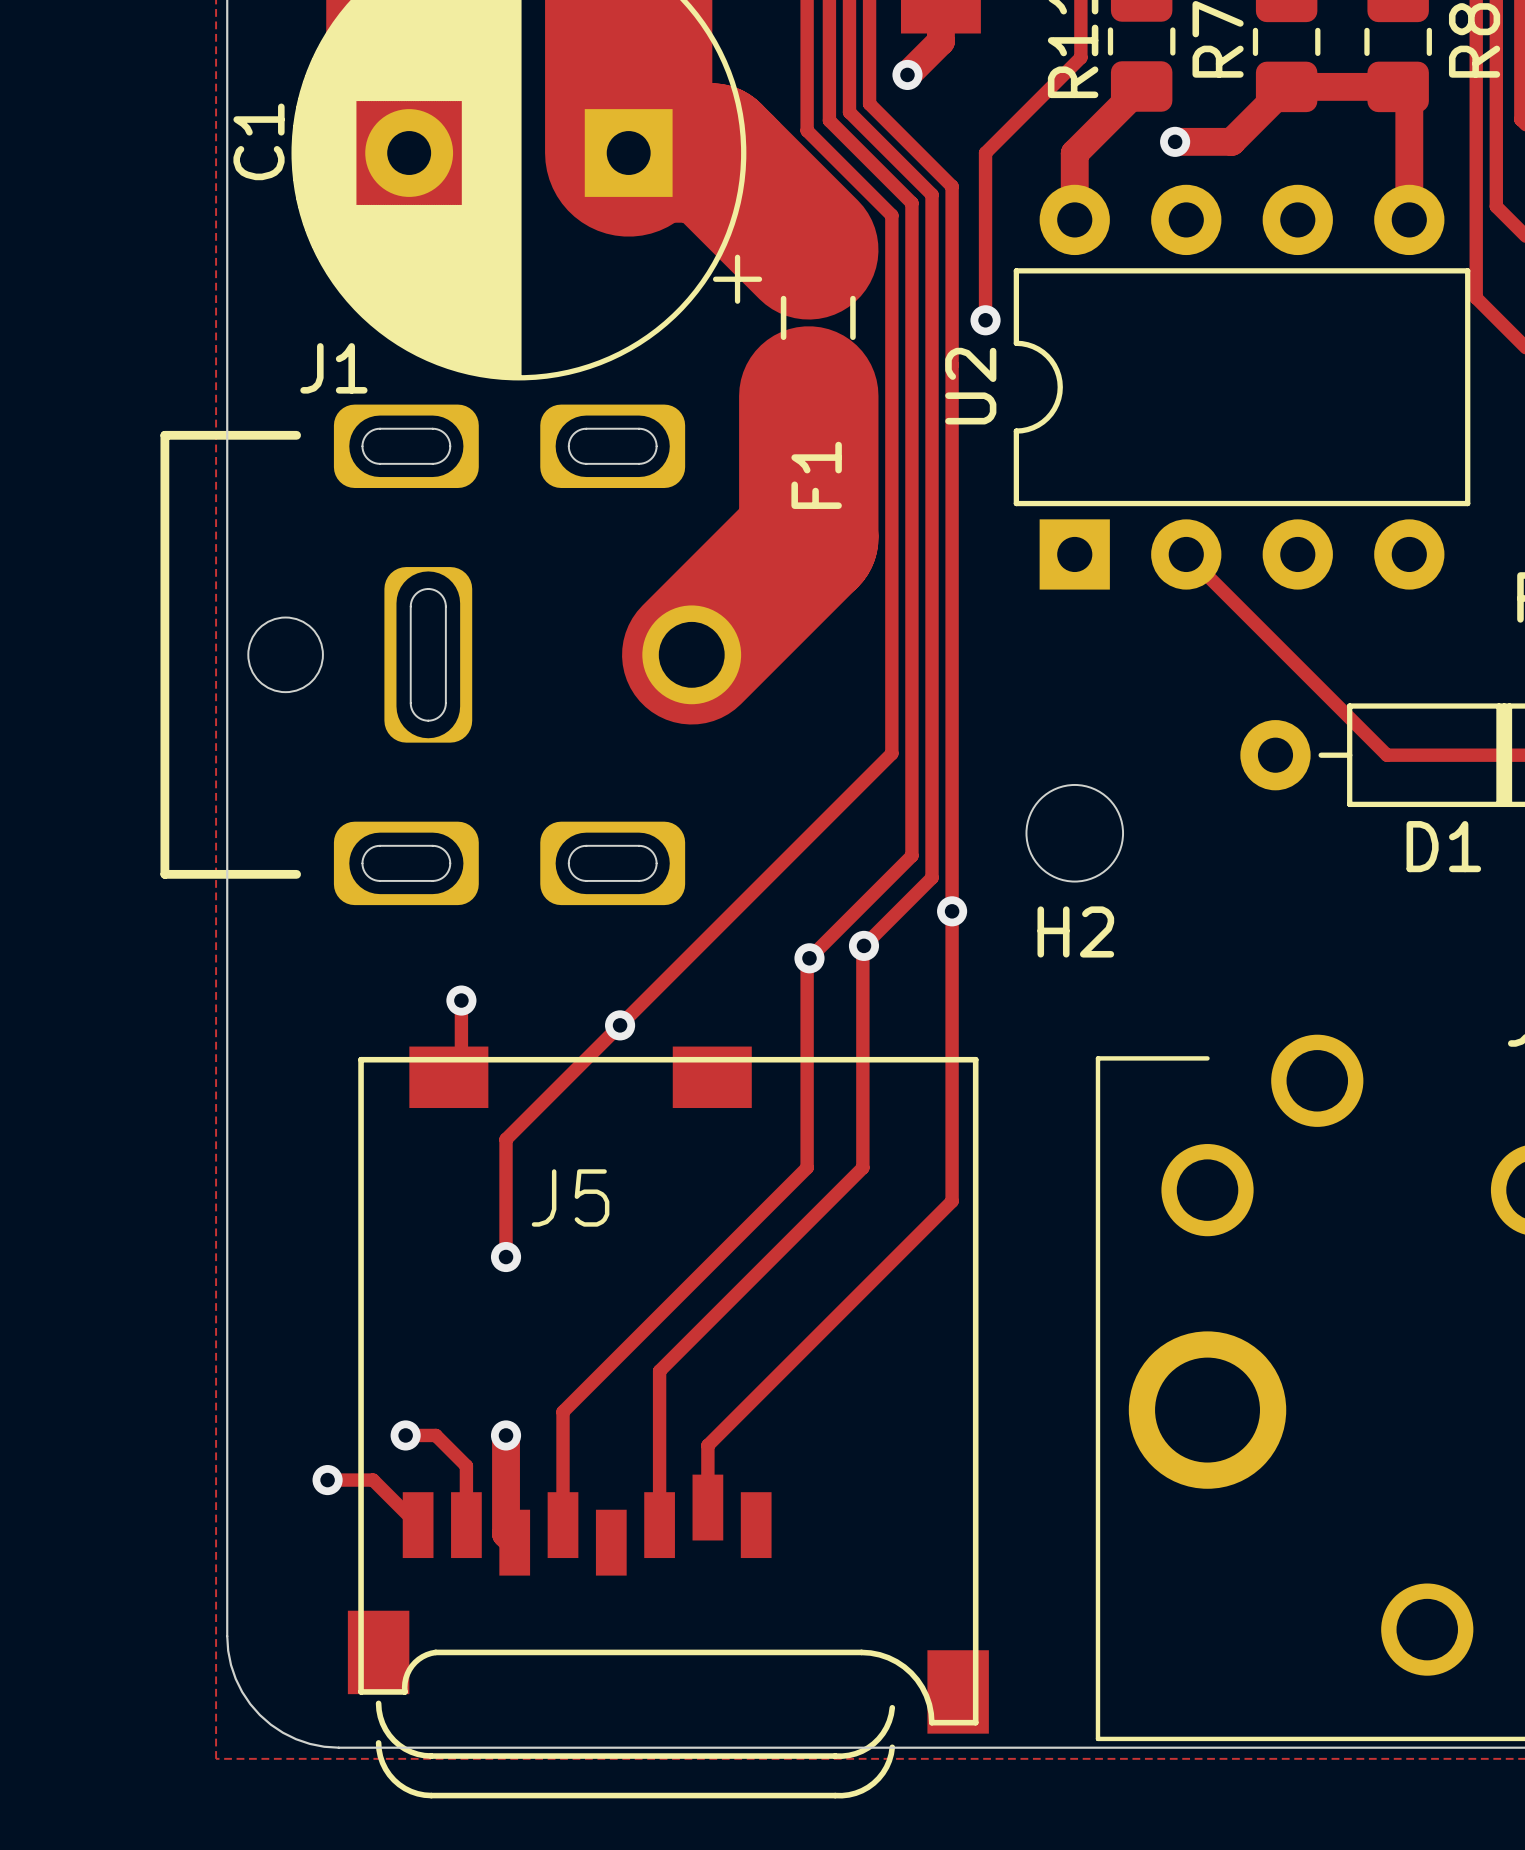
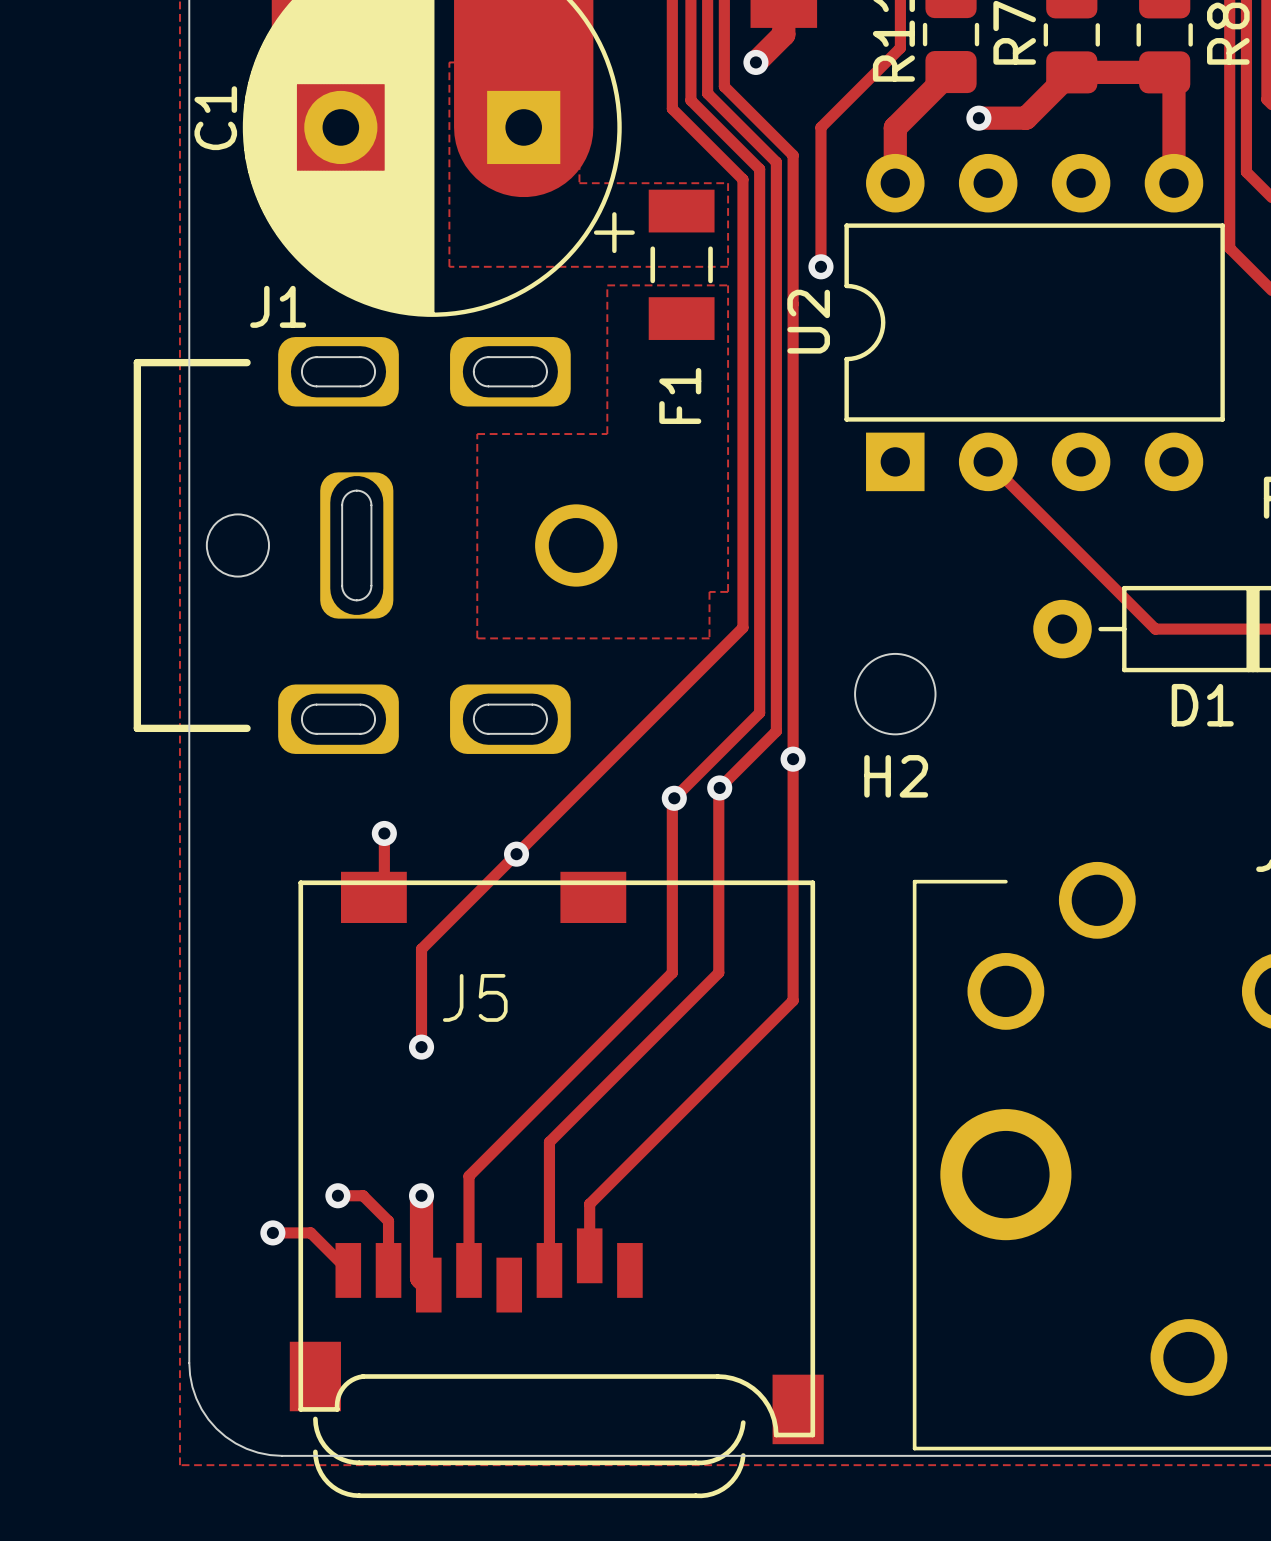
zone outline: none -> (449, 62) (449, 266) (728, 266) (728, 183) (579, 183) (579, 62) (449, 62)
track: (628, 153) (711, 153) (808, 249) -> none
zone outline: none -> (607, 285) (607, 434) (477, 434) (477, 638) (709, 638) (709, 591) (728, 591) (728, 285) (607, 285)
track: (808, 395) (808, 537) (691, 654) -> none

